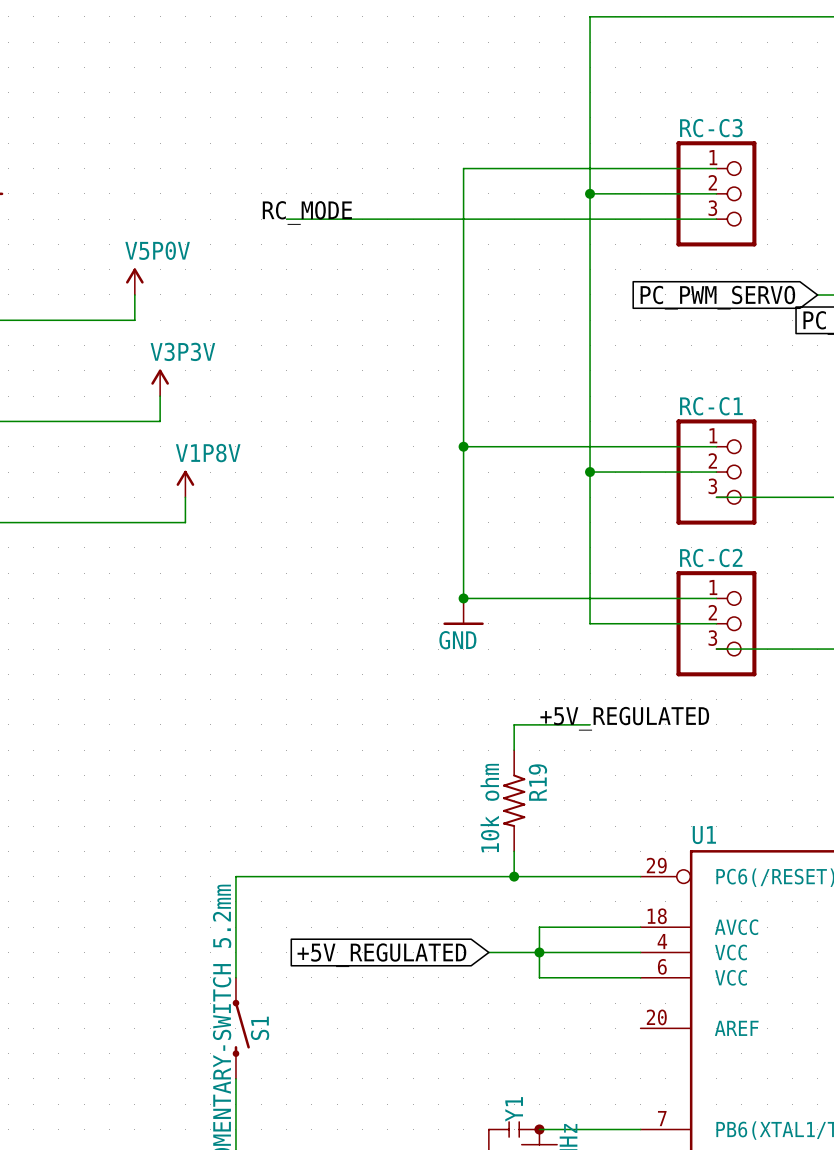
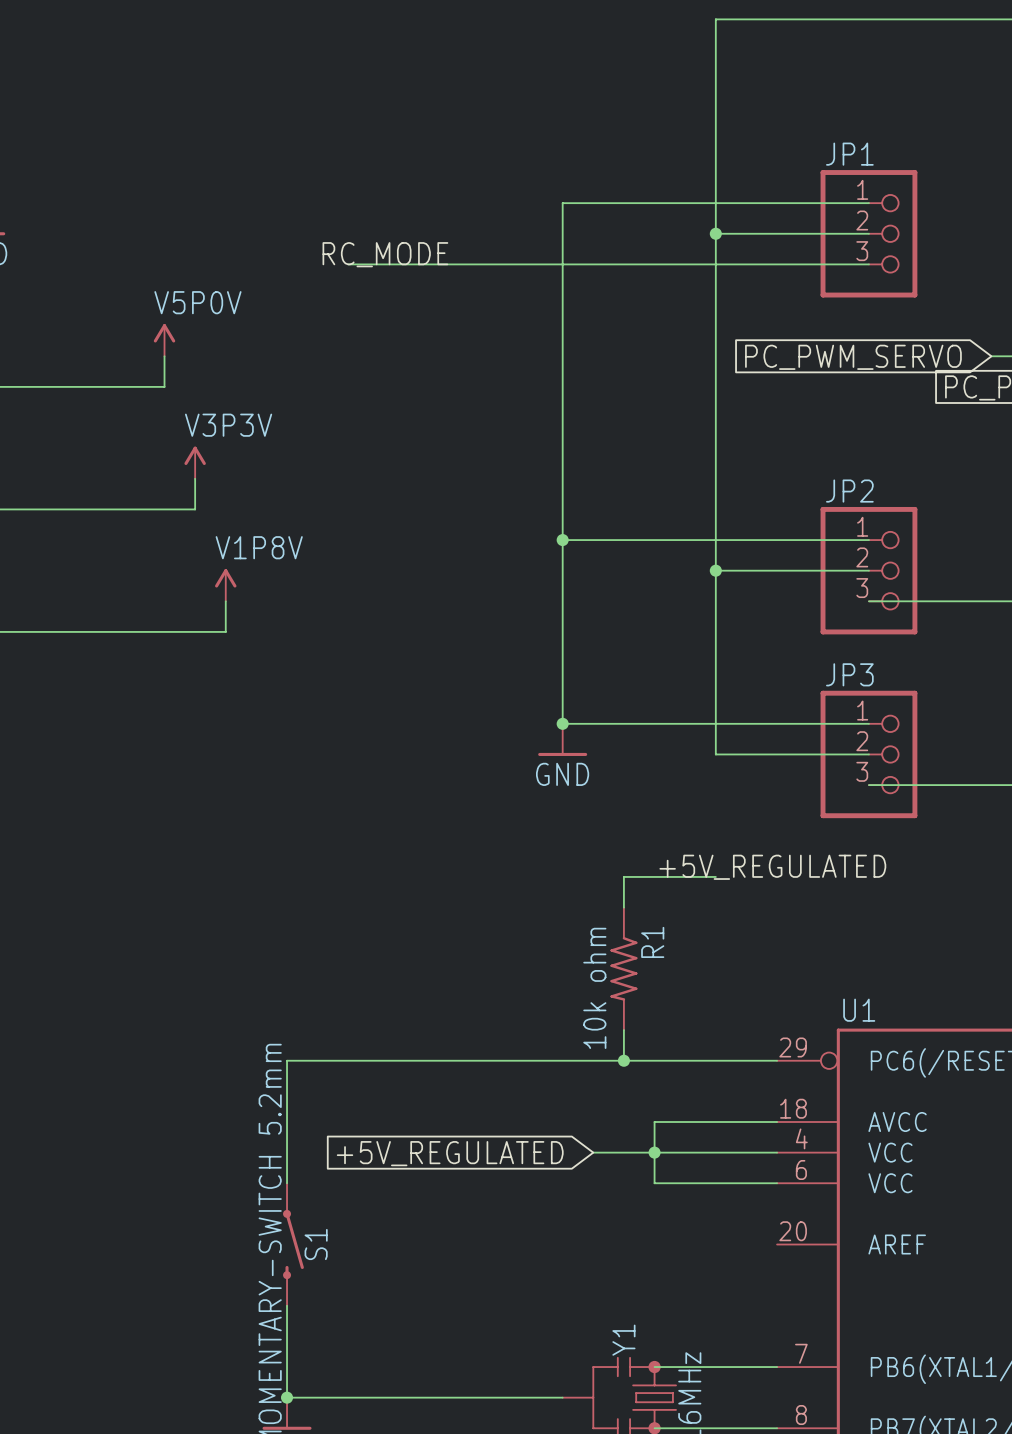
RC-C3 name: RC-C3 (711, 128) -> JP1 (849, 154)
RC-C1 name: RC-C1 (711, 406) -> JP2 (849, 491)
RC-C2 name: RC-C2 (711, 558) -> JP3 (849, 674)
R19 name: R19 (537, 782) -> R1 (652, 942)

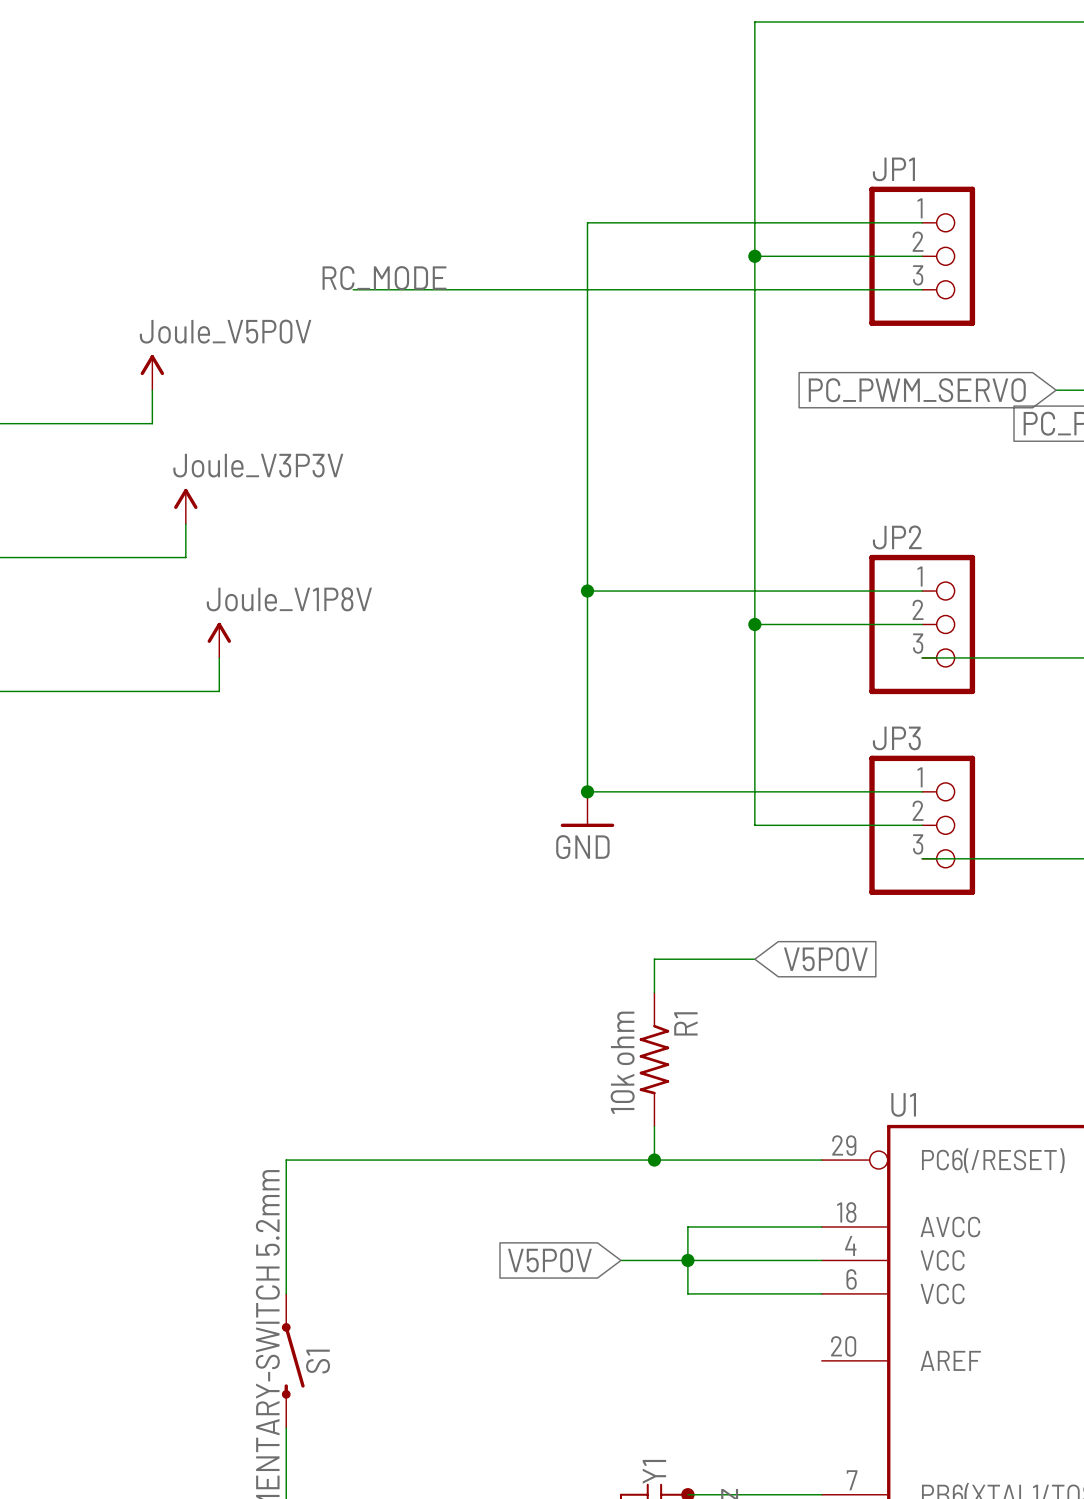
power symbol: V5P0V (164, 340) -> Joule_V5P0V (152, 372)
power symbol: V3P3V (195, 462) -> Joule_V3P3V (185, 506)
power symbol: V1P8V (225, 585) -> Joule_V1P8V (219, 640)
label: +5V_REGULATED (772, 867) -> none
global label: none -> V5P0V (825, 959)
global label: +5V_REGULATED (450, 1153) -> V5P0V (549, 1260)

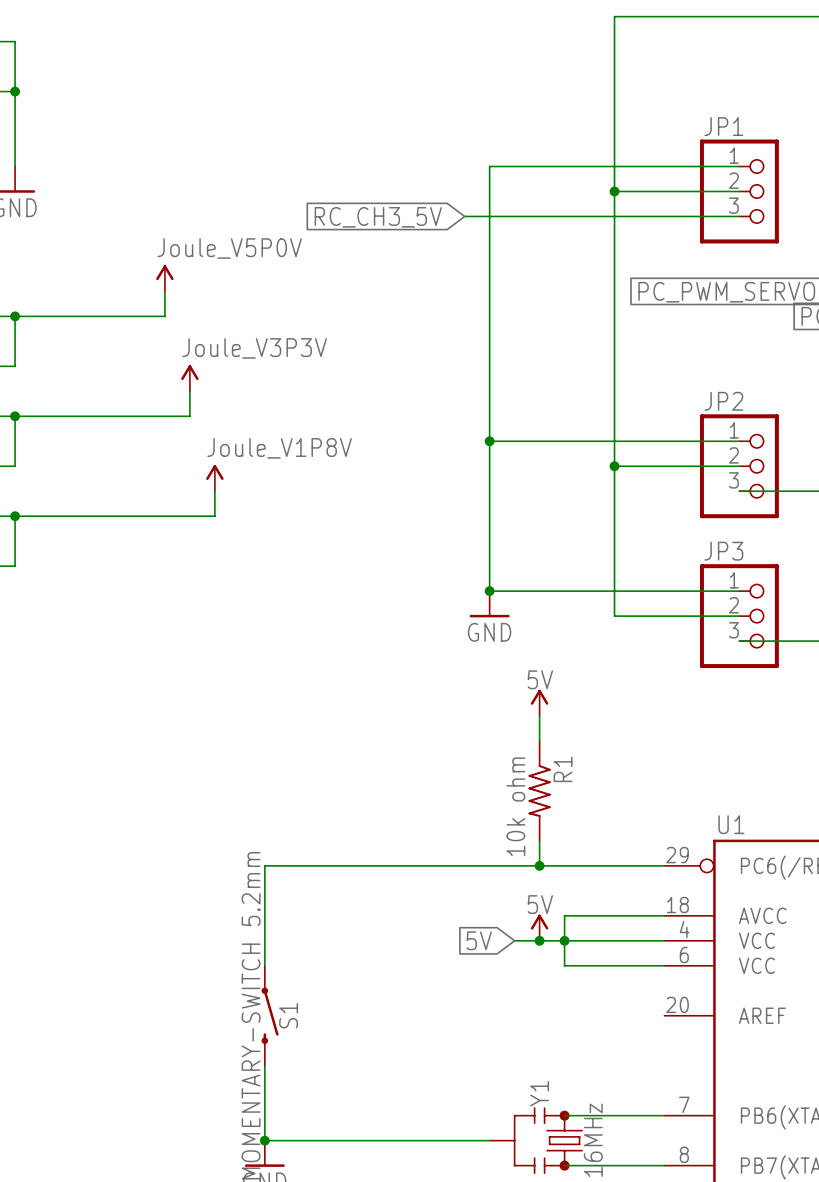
label: RC_MODE (384, 278) -> none
wire: (353, 289) (554, 289) -> none
global label: none -> RC_CH3_5V (378, 217)
power symbol: none -> 5V (539, 702)
wire: (654, 959) (754, 959) -> none
global label: V5P0V (825, 959) -> none
power symbol: none -> 5V (539, 927)
global label: V5P0V (549, 1260) -> 5V (479, 940)
junction: none -> (539, 940)

